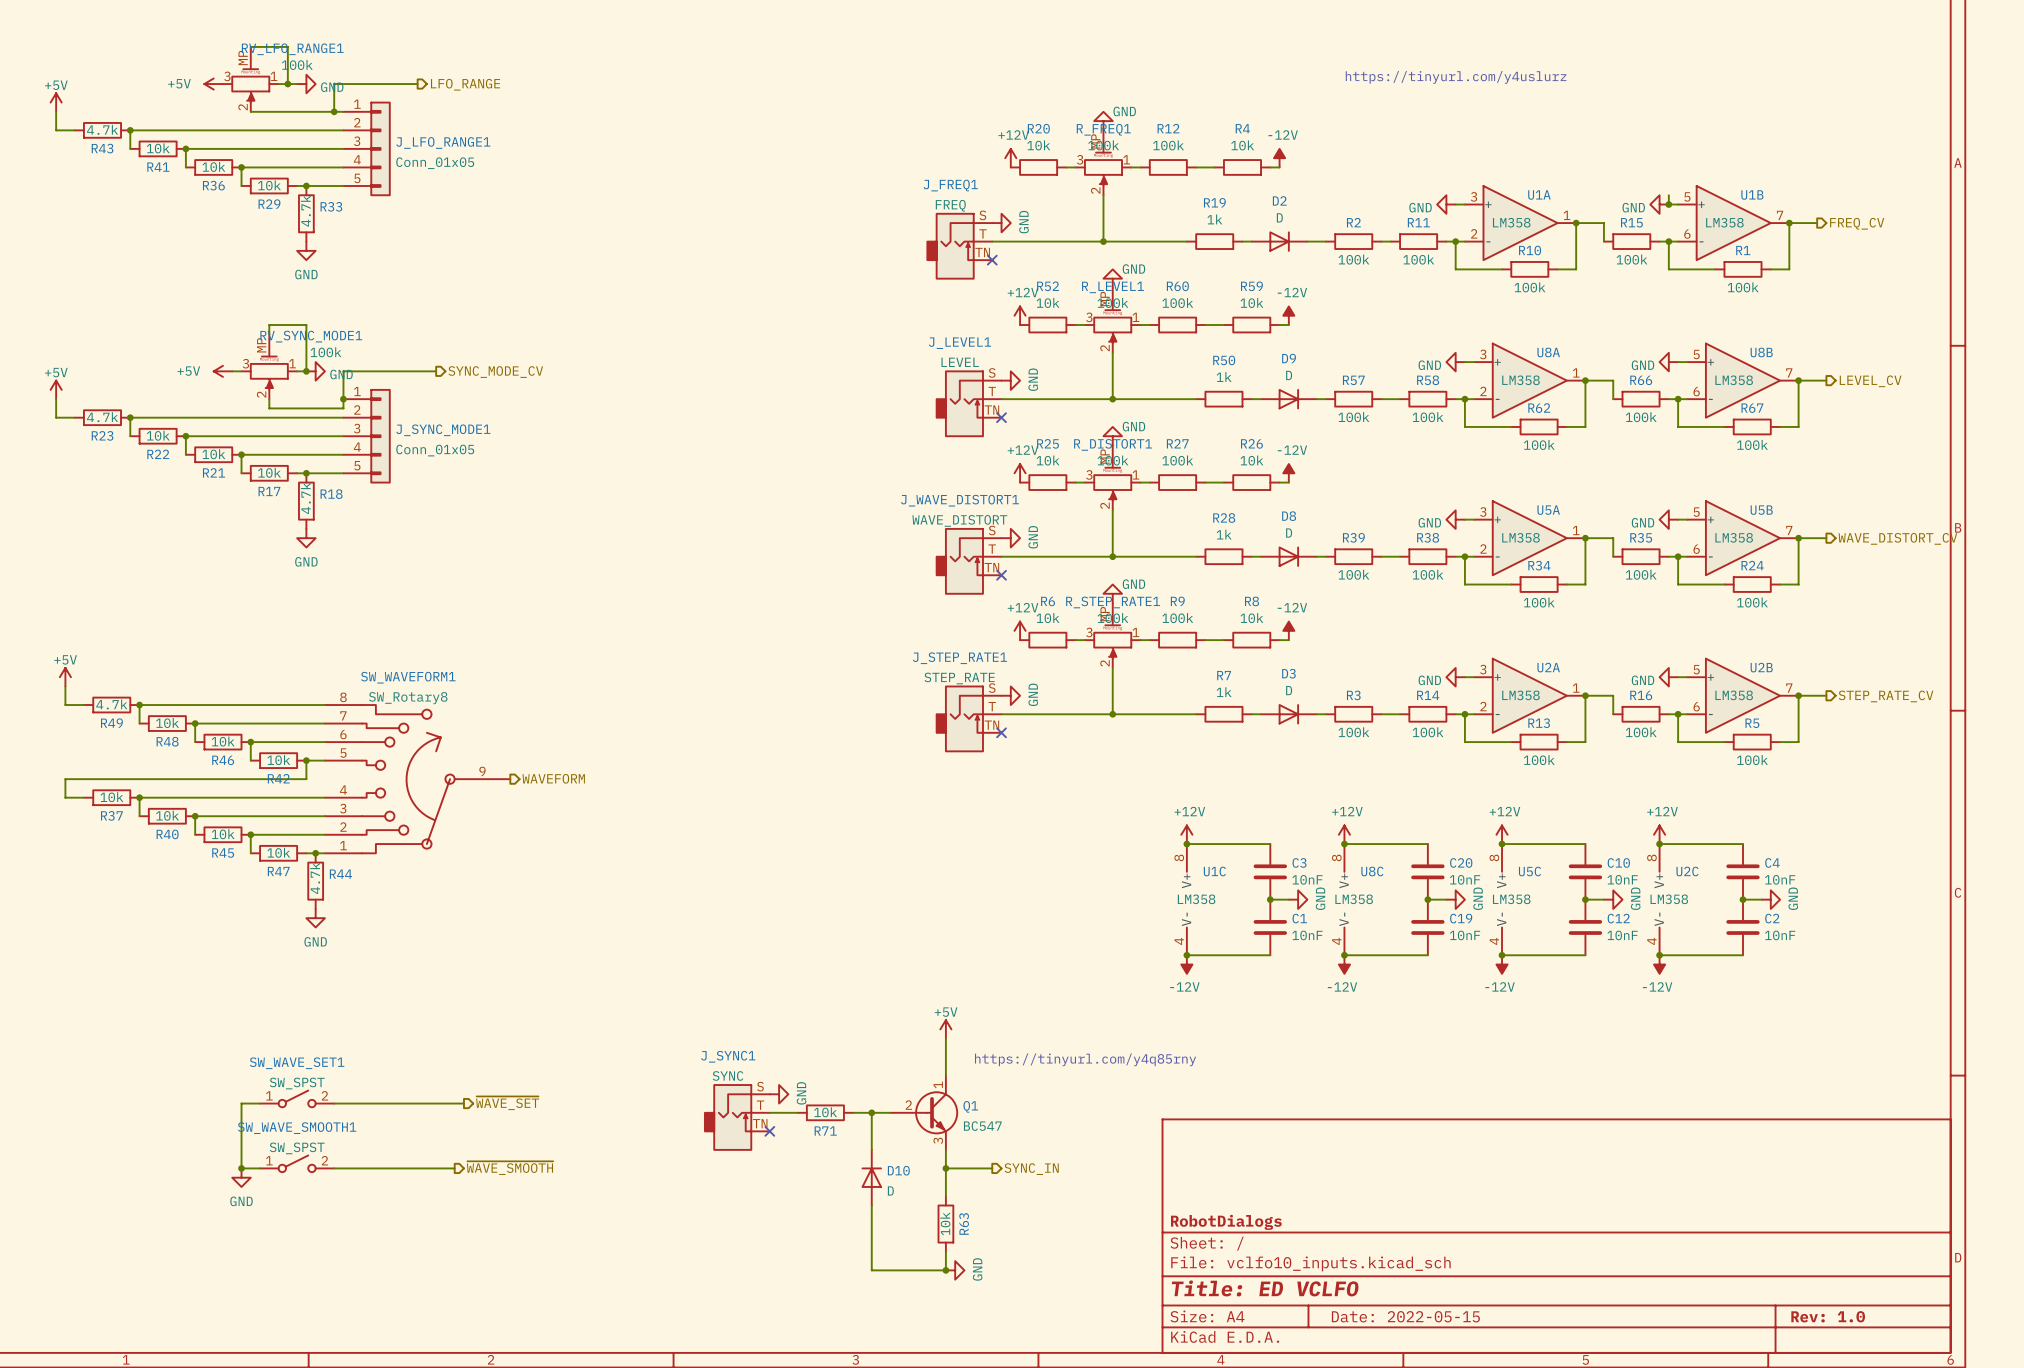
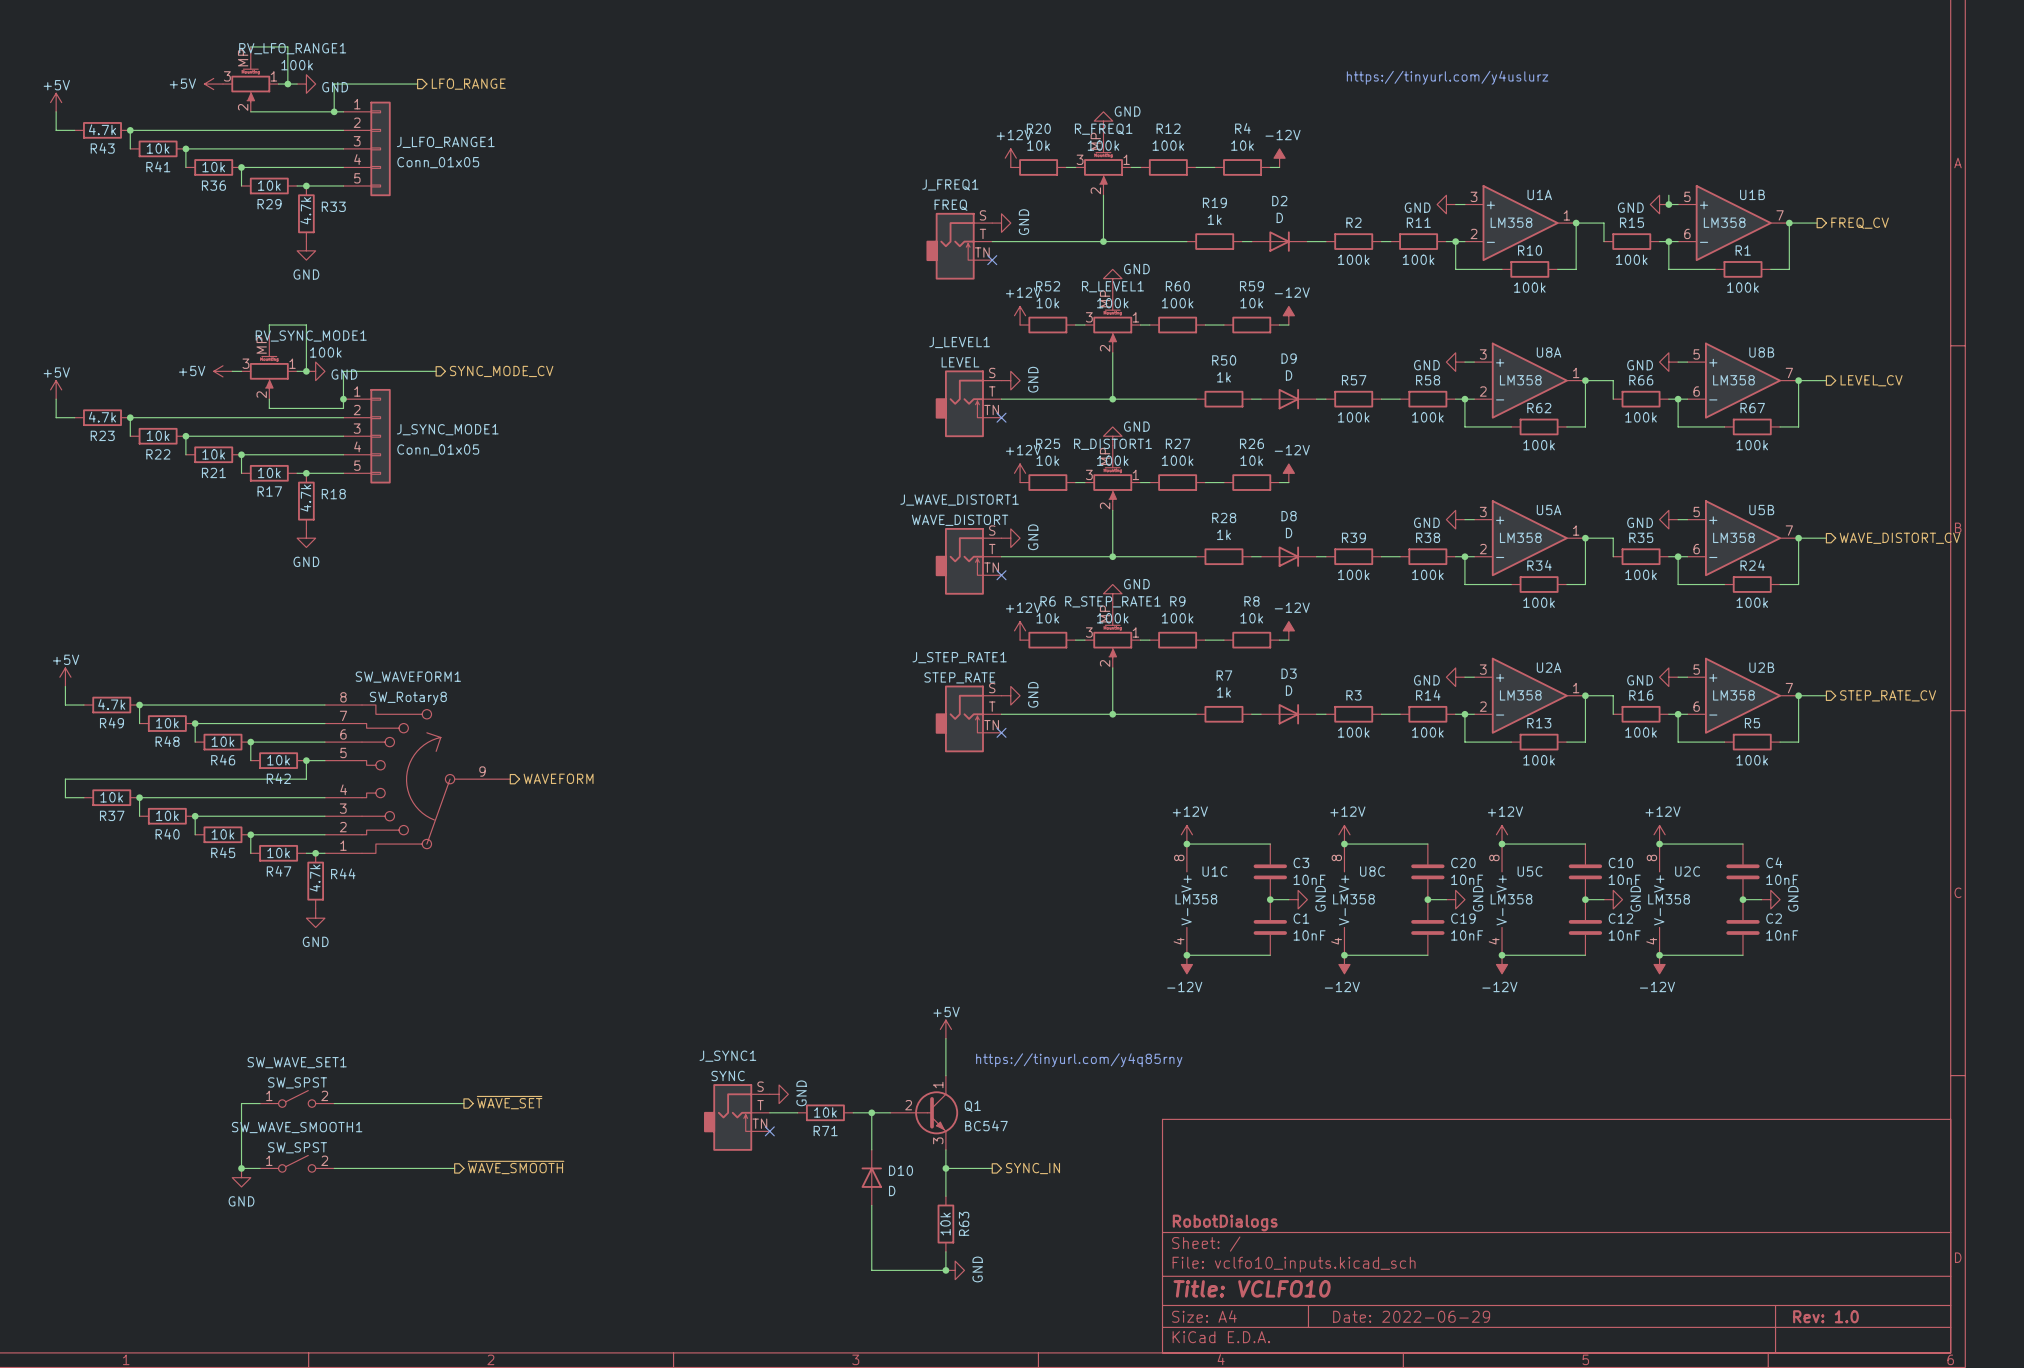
title block: Title: ED VCLFO (1265, 1288) -> Title: VCLFO10 (1252, 1288)
title block: Date: 2022-05-15 (1405, 1316) -> Date: 2022-06-29 (1411, 1316)

